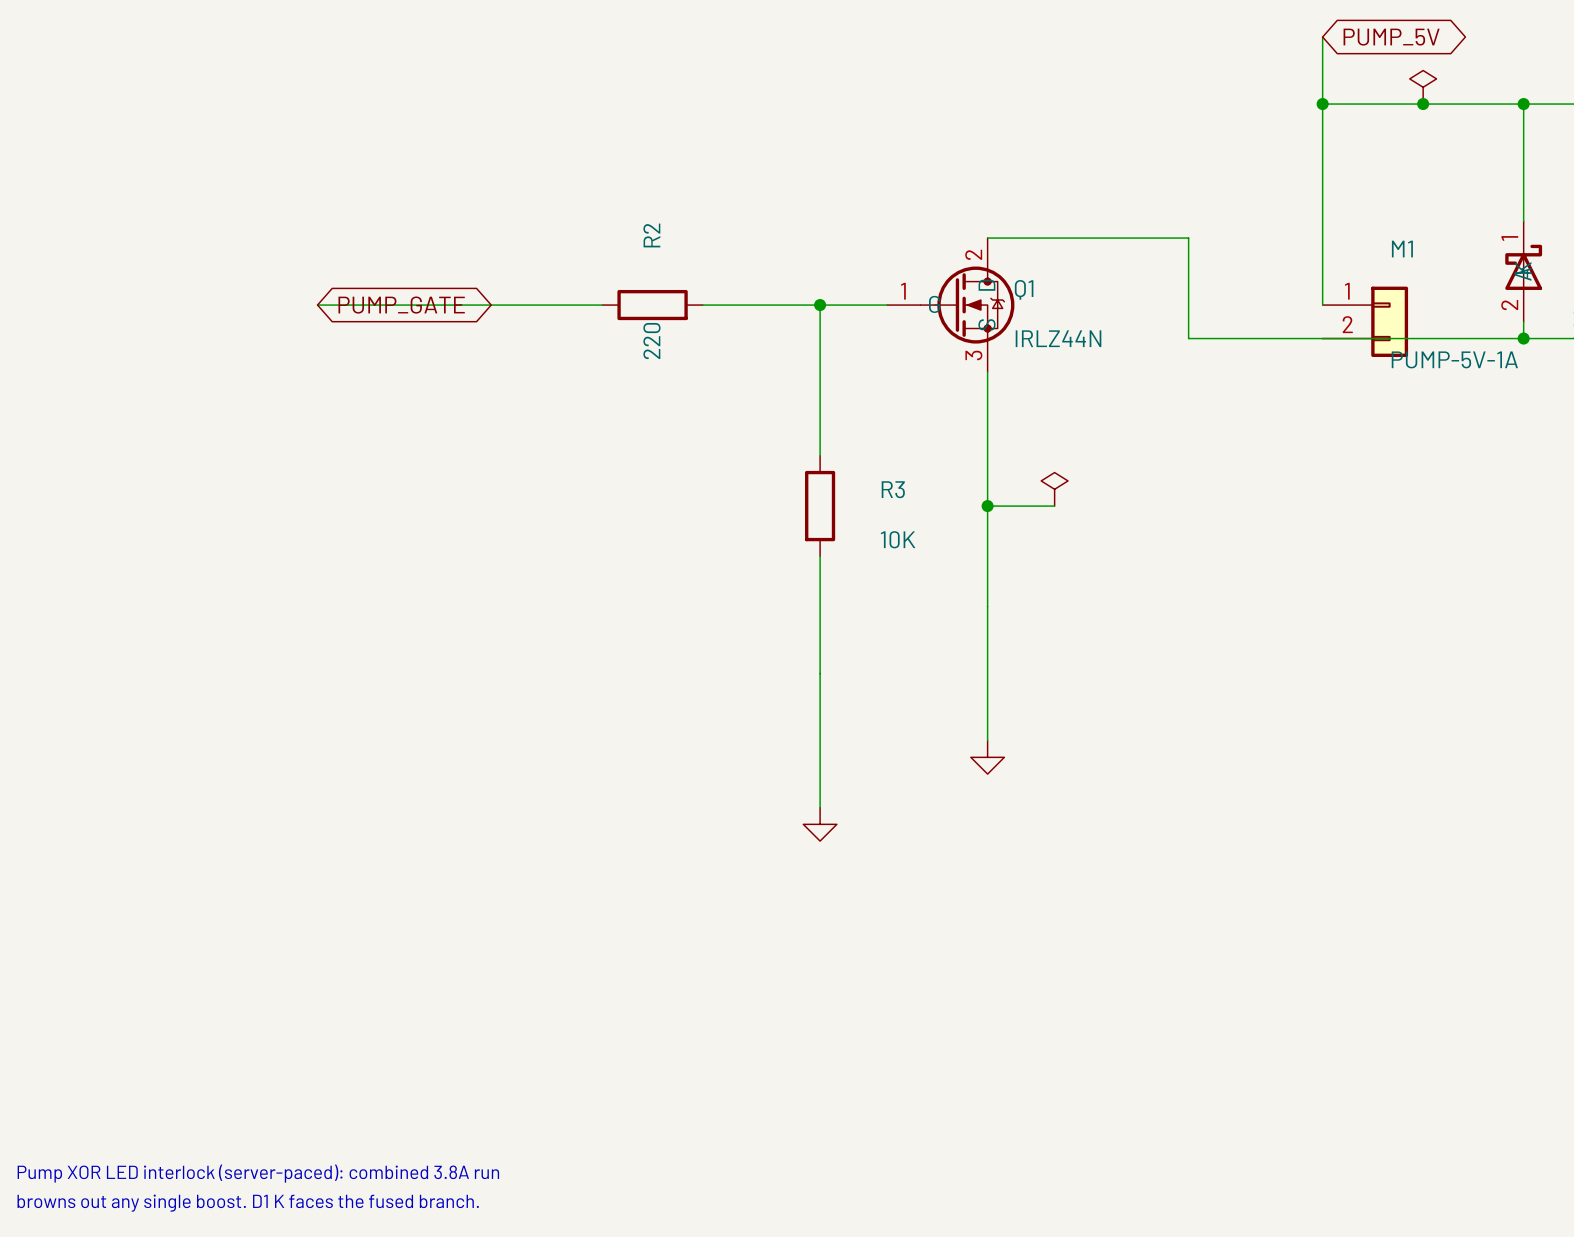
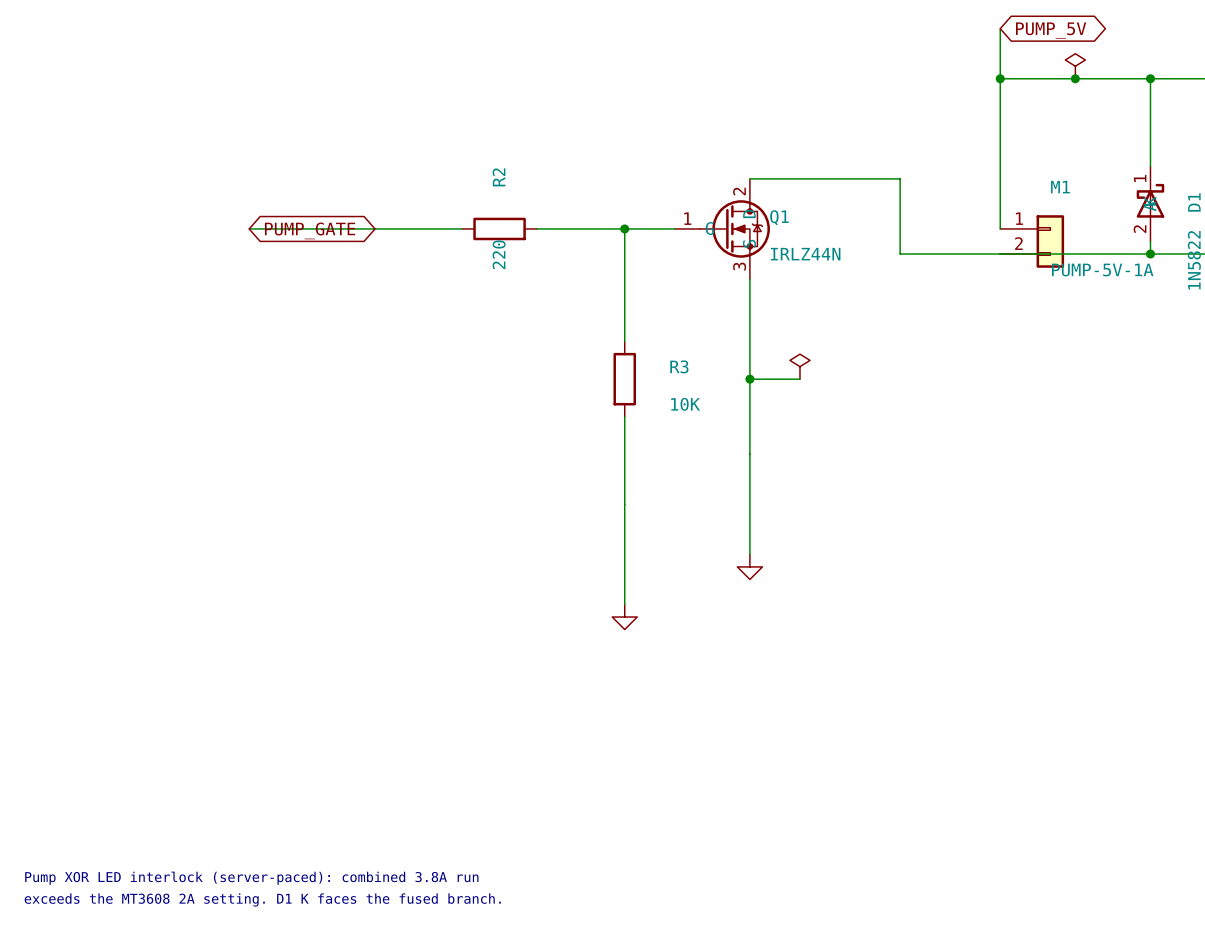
text: browns out any single boost. D1 K faces the fused branch. (248, 1203) -> exceeds the MT3608 2A setting. D1 K faces the fused branch. (262, 899)

